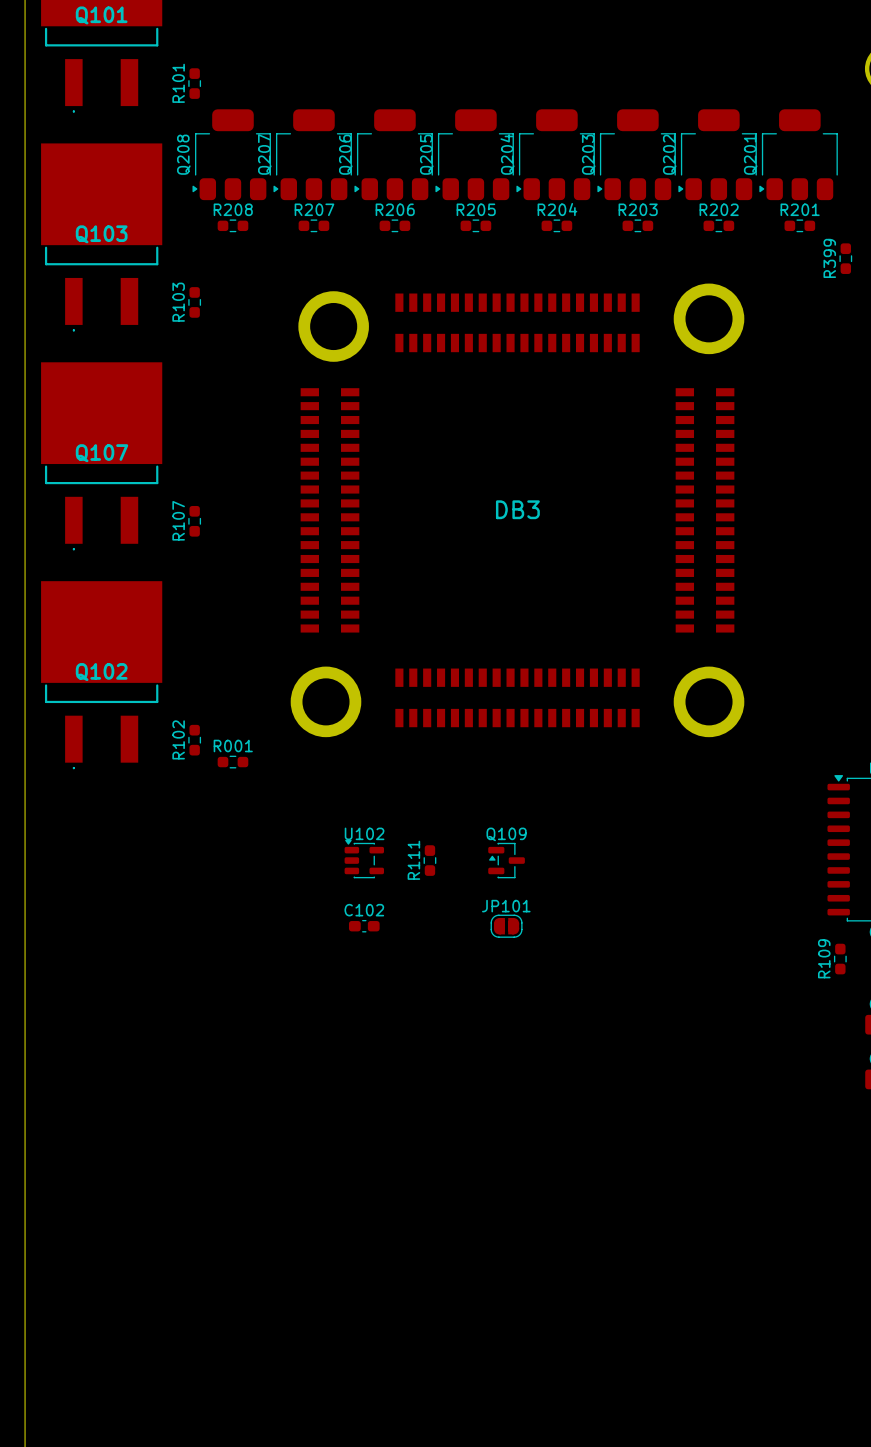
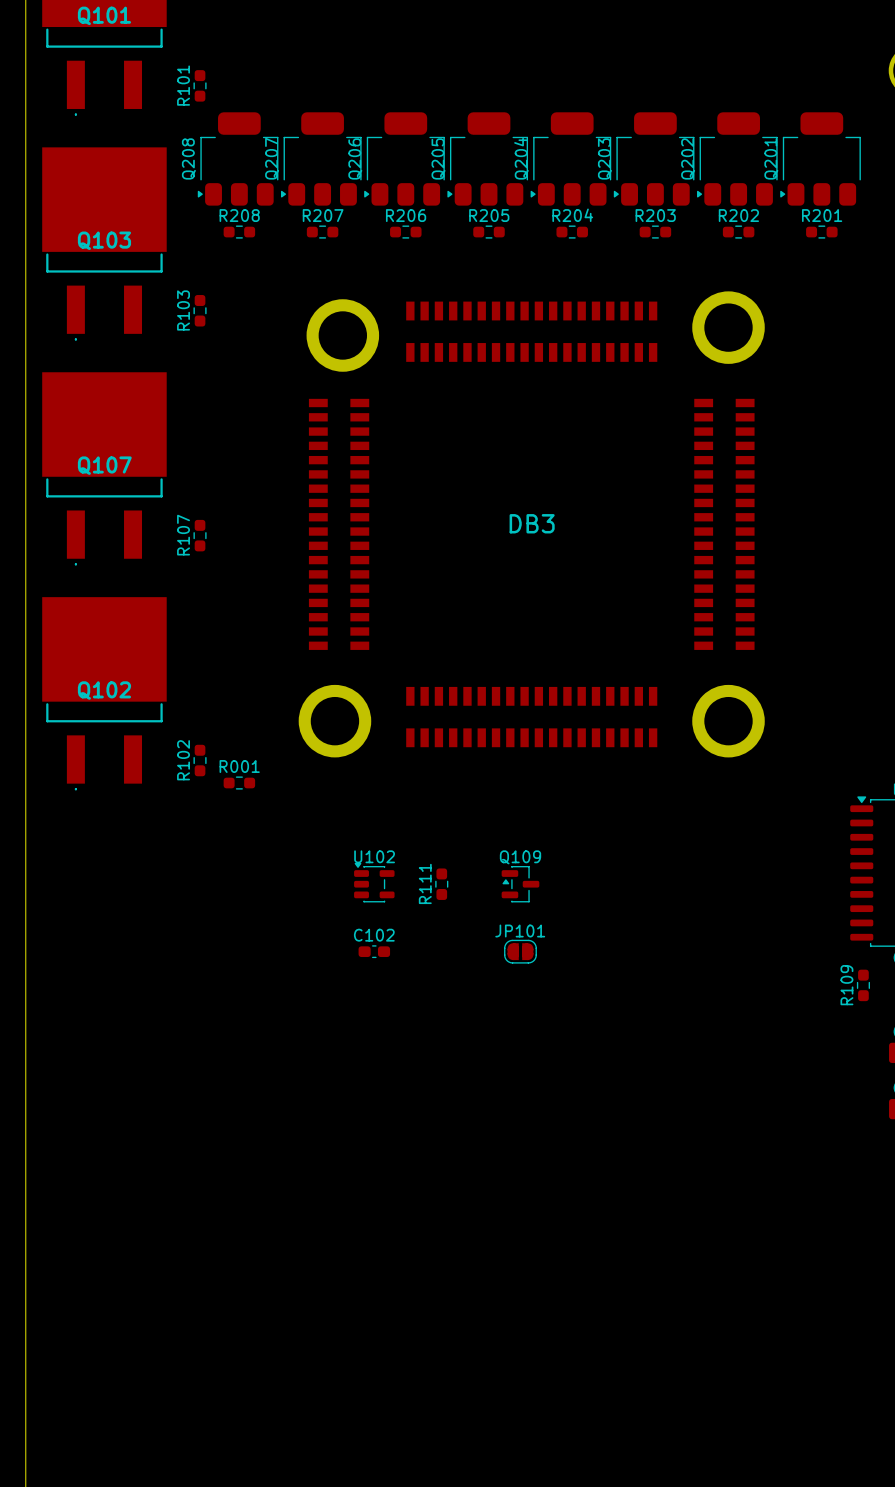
R399: (845, 258) -> none

